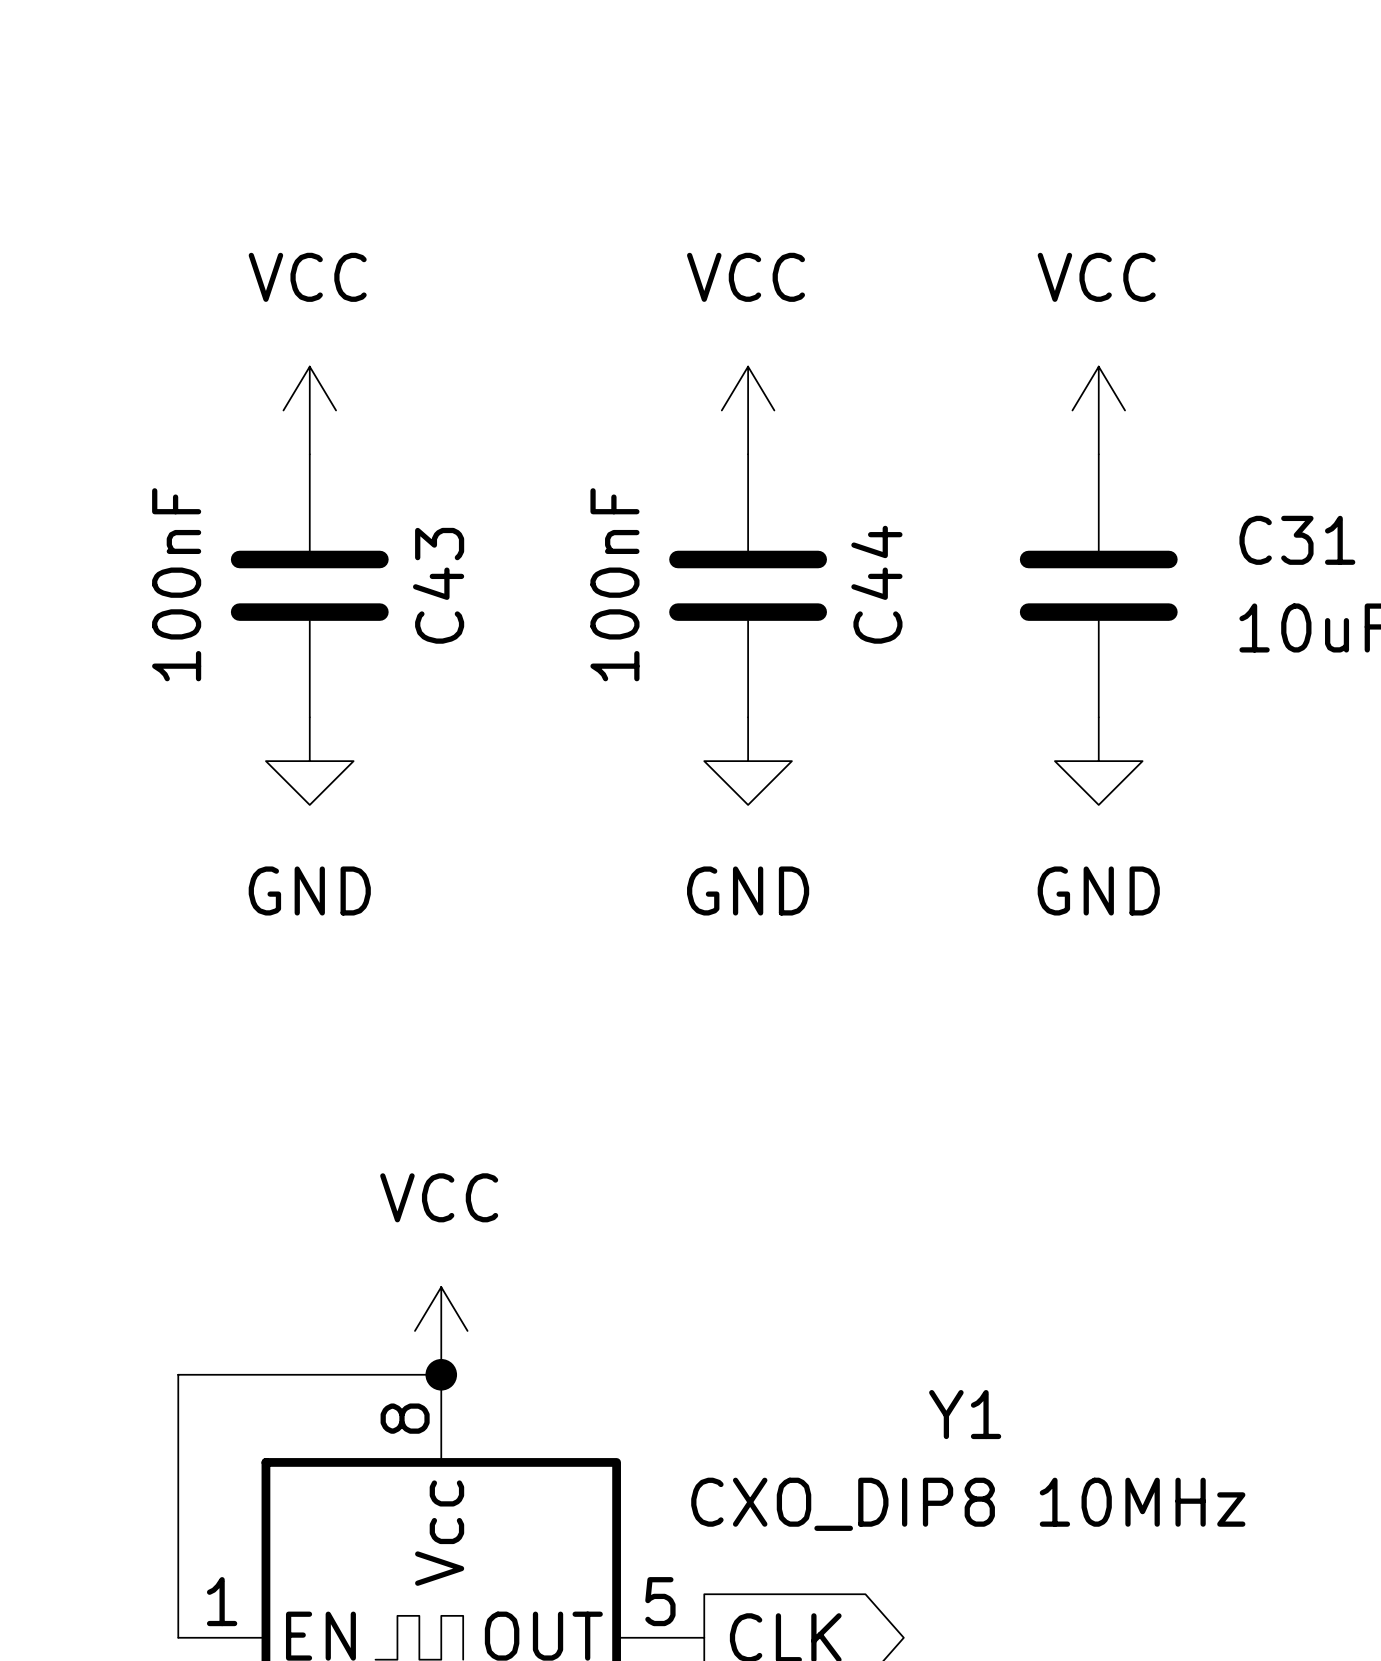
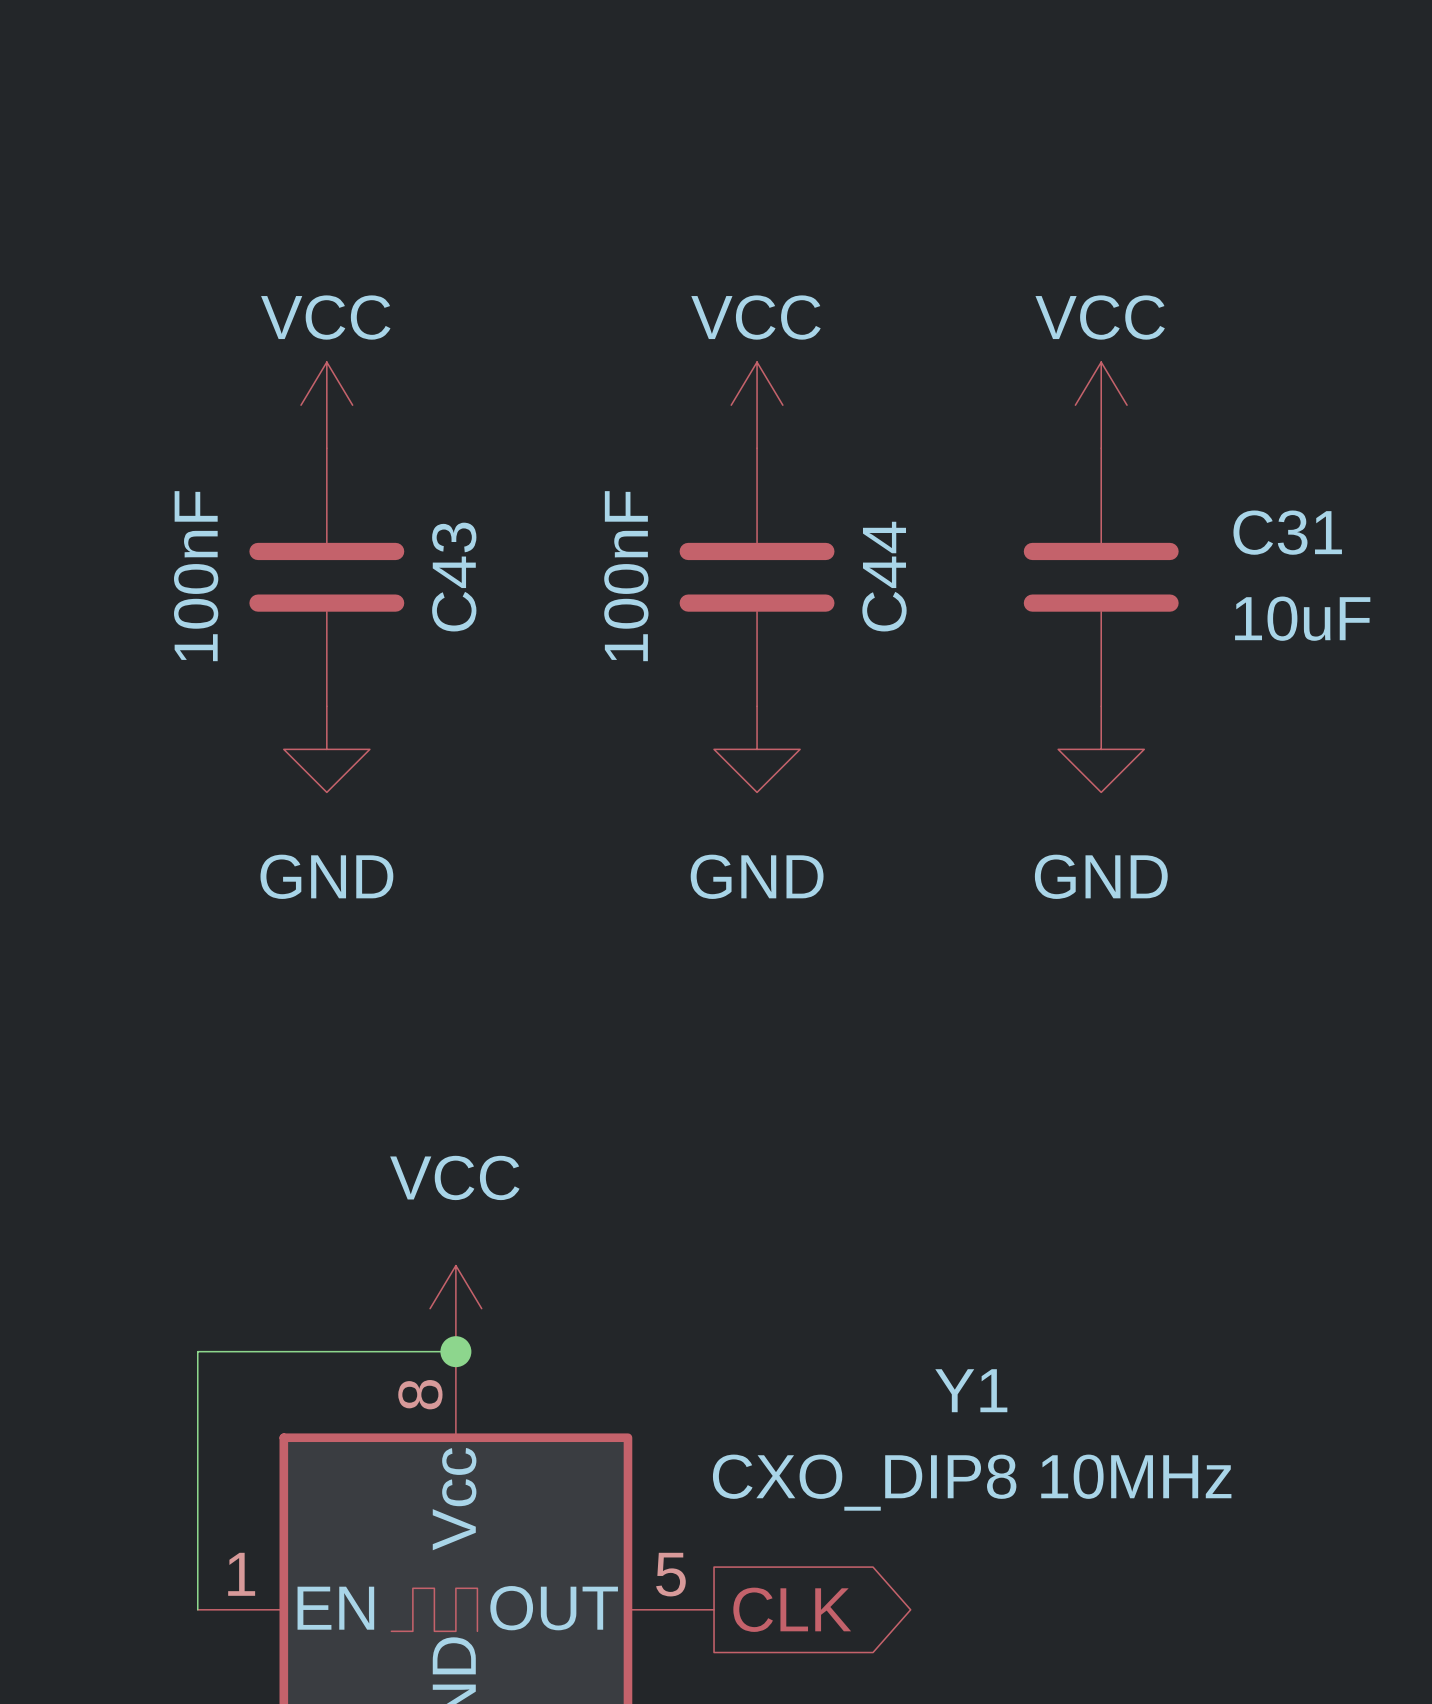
power symbol text position: VCC (307, 277) -> VCC (325, 317)
power symbol text position: VCC (746, 277) -> VCC (755, 317)
power symbol text position: VCC (1096, 277) -> VCC (1100, 317)

